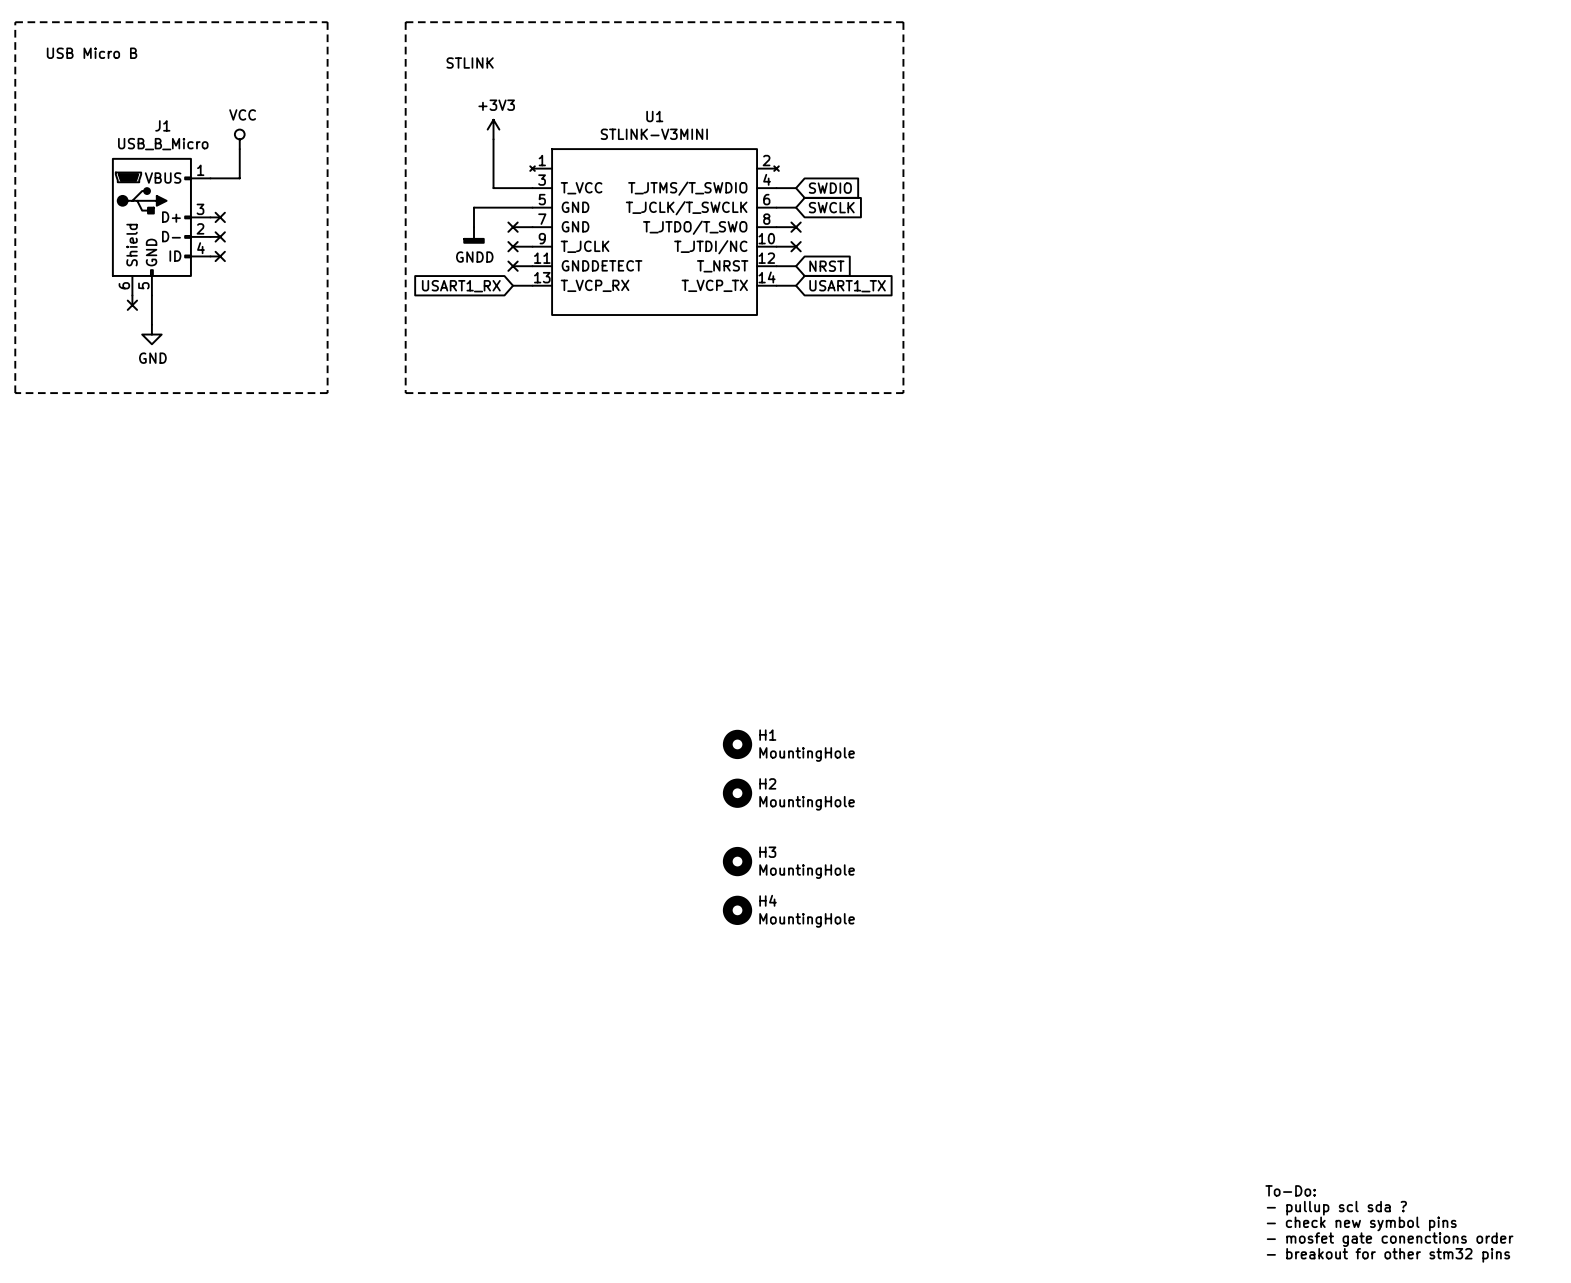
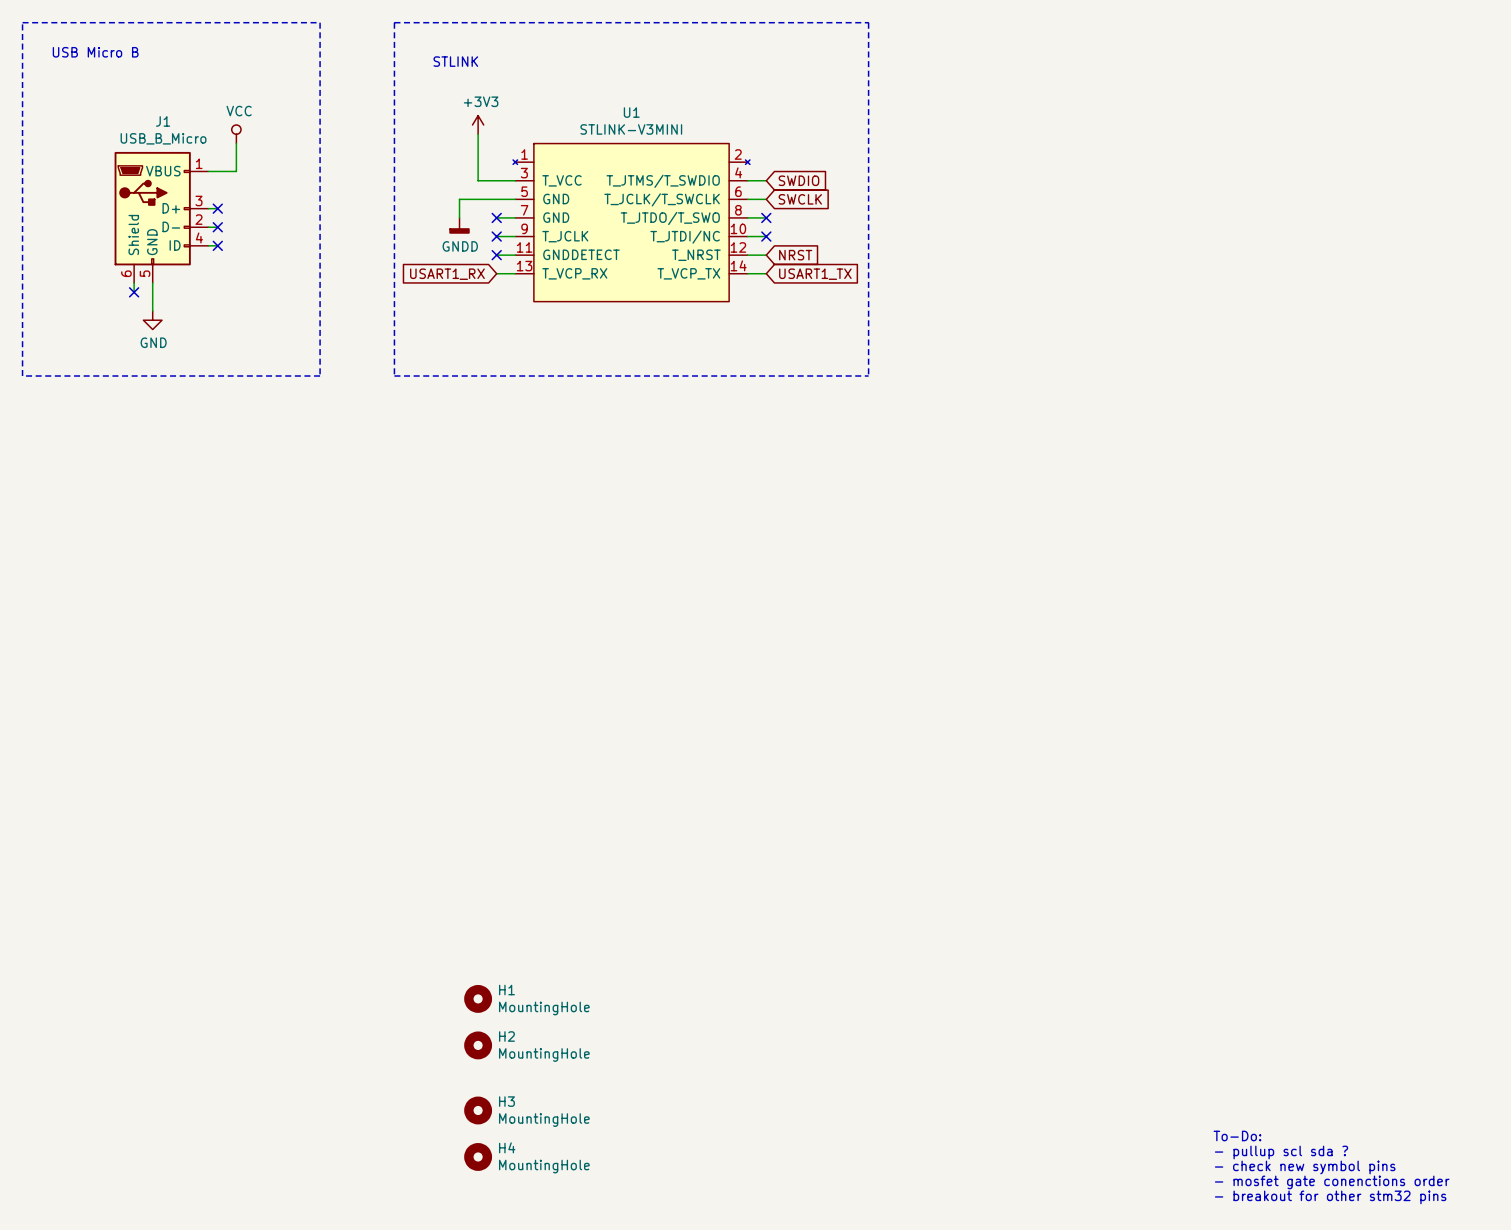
H1 position: (737, 744) -> (478, 998)
H2 position: (737, 793) -> (478, 1045)
H3 position: (737, 861) -> (478, 1110)
H4 position: (737, 910) -> (478, 1156)

